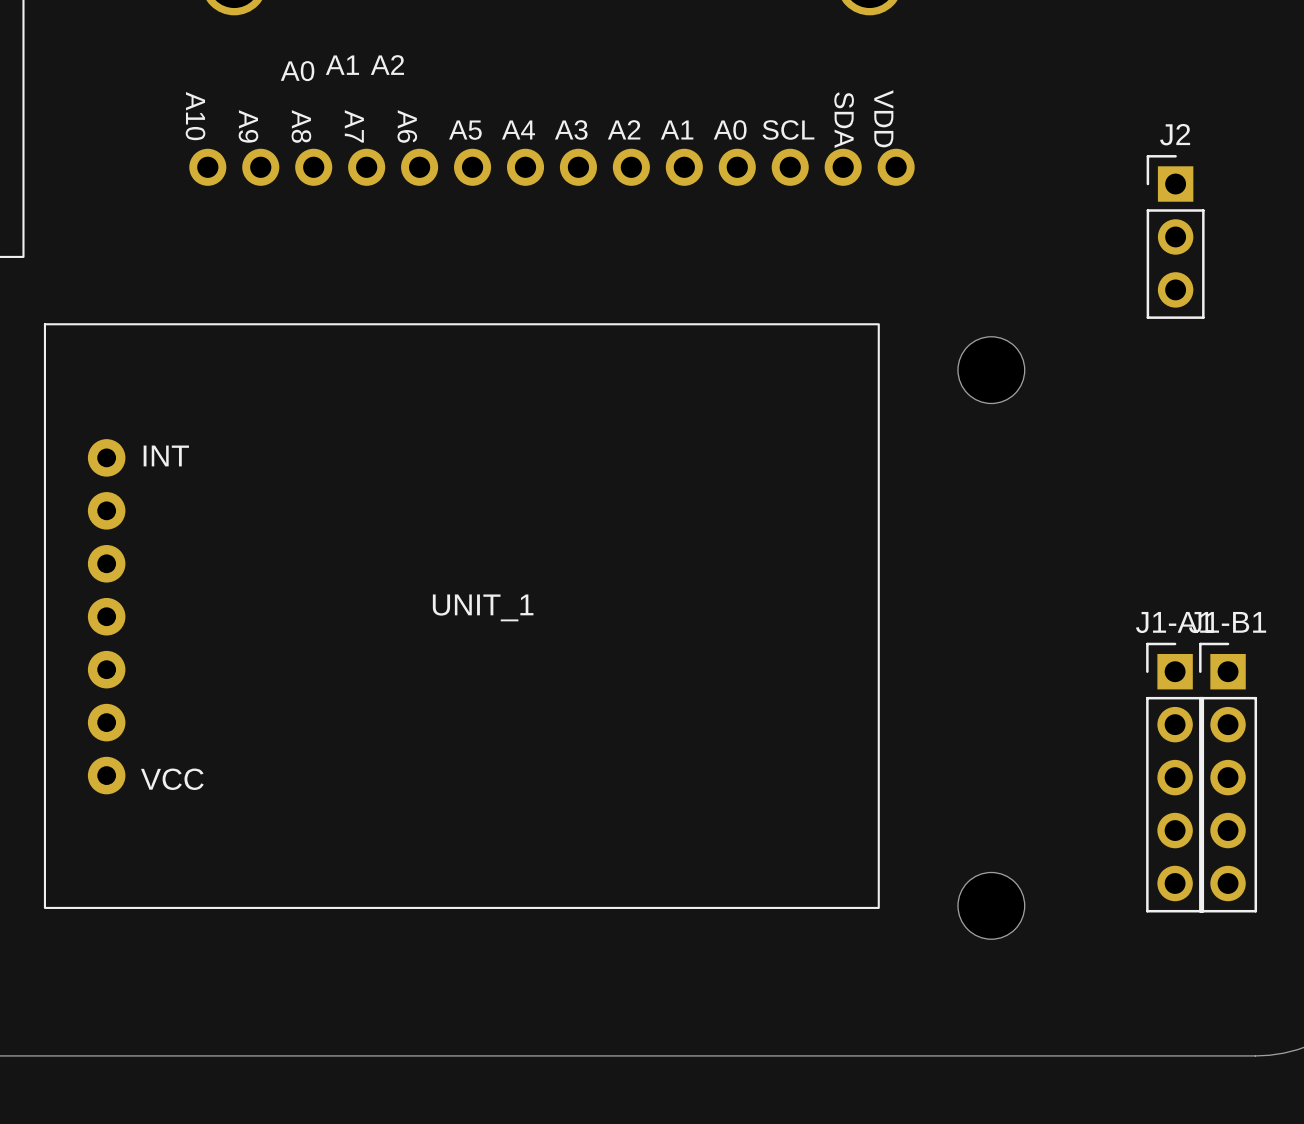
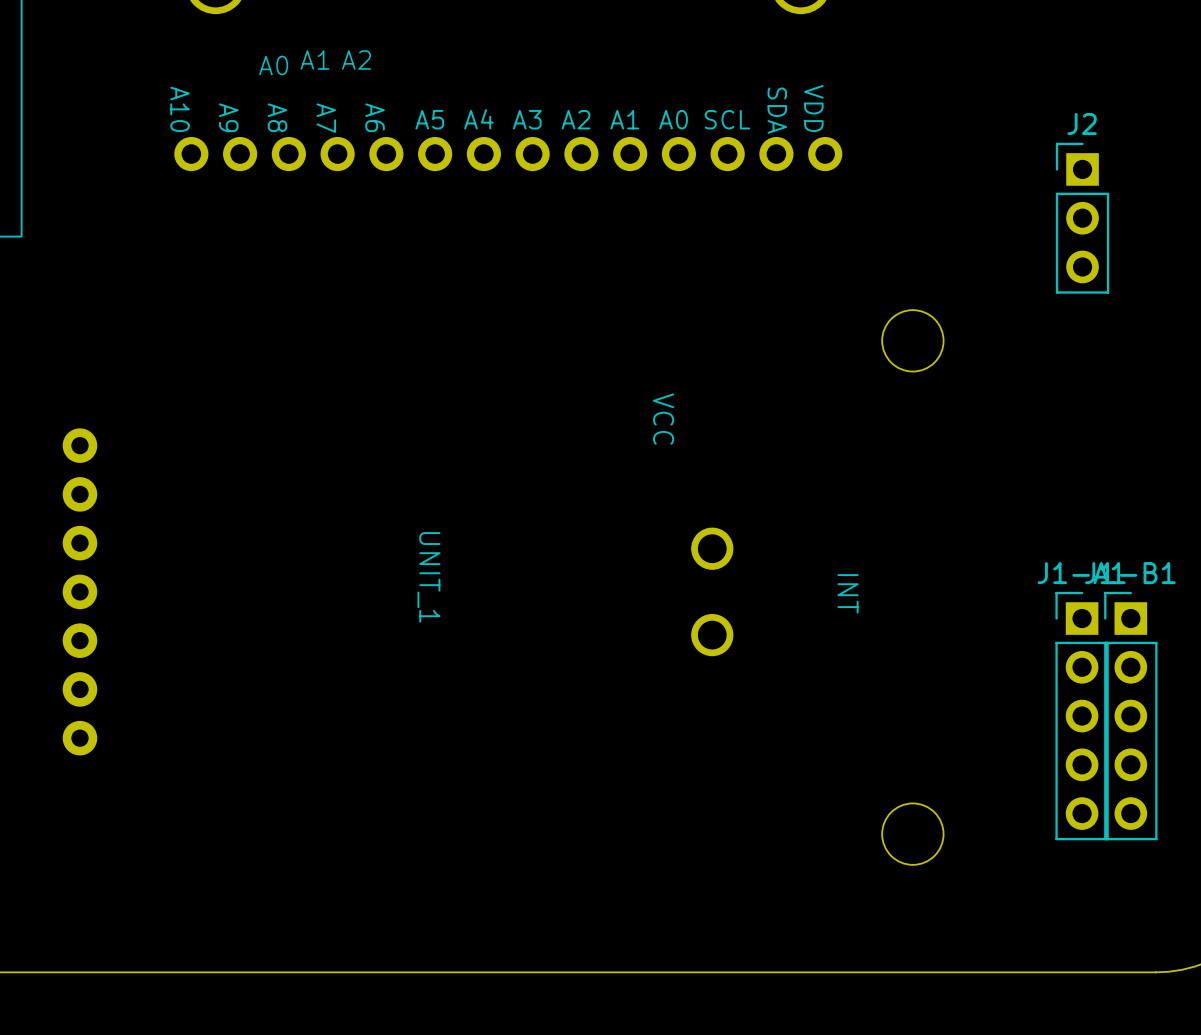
UNIT_1 footprint: [43, 323, 880, 909] -> [62, 428, 734, 756]

